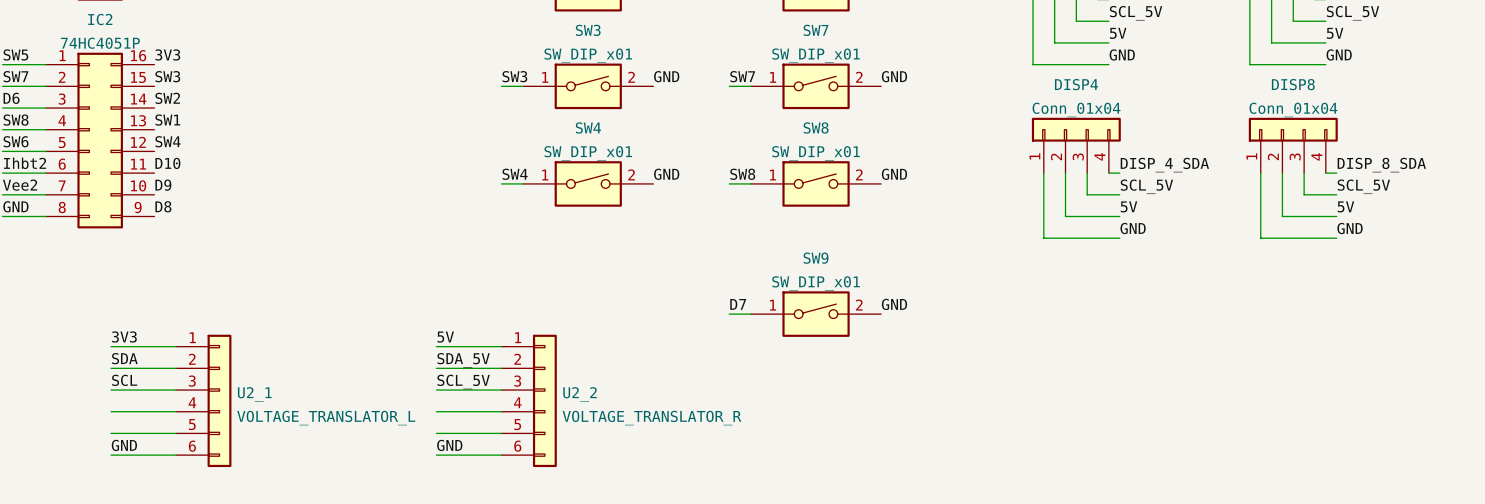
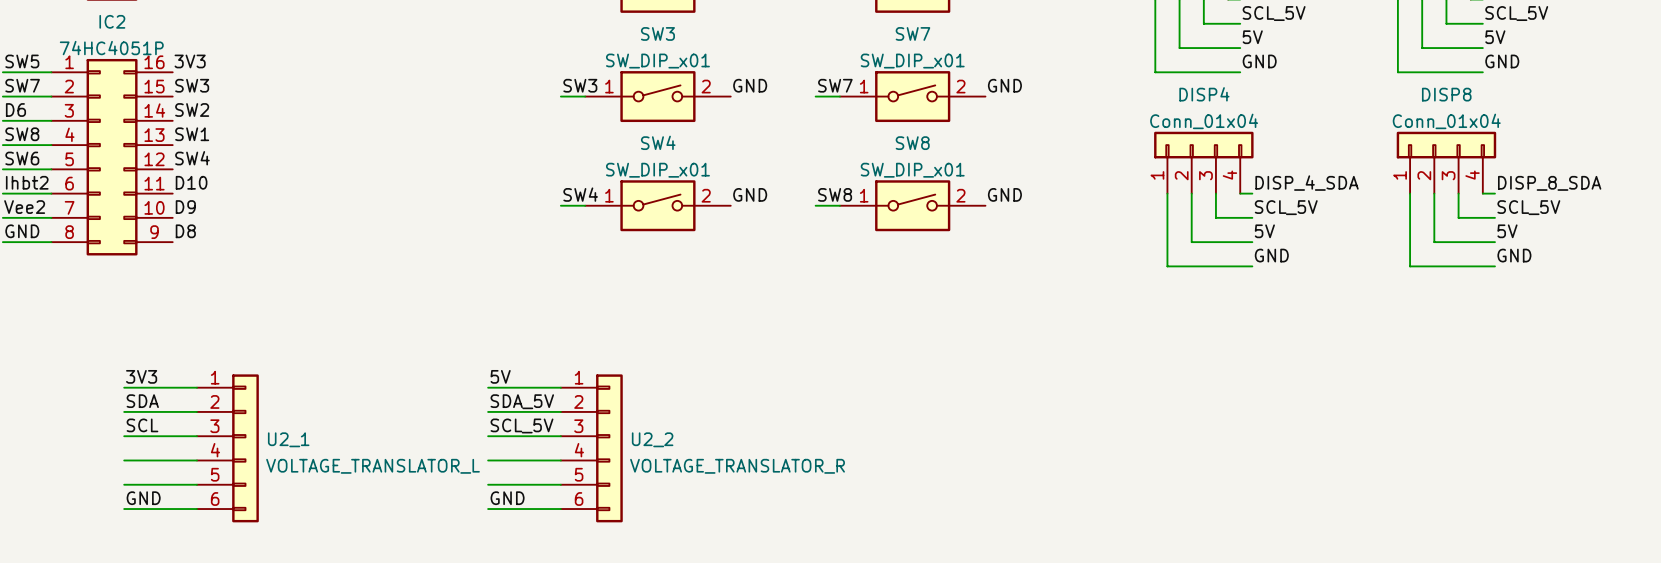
label: D7 (738, 304) -> none
label: GND (894, 304) -> none
wire: (729, 314) (750, 314) -> none
SW9: SW_DIP_x01 (816, 314) -> none

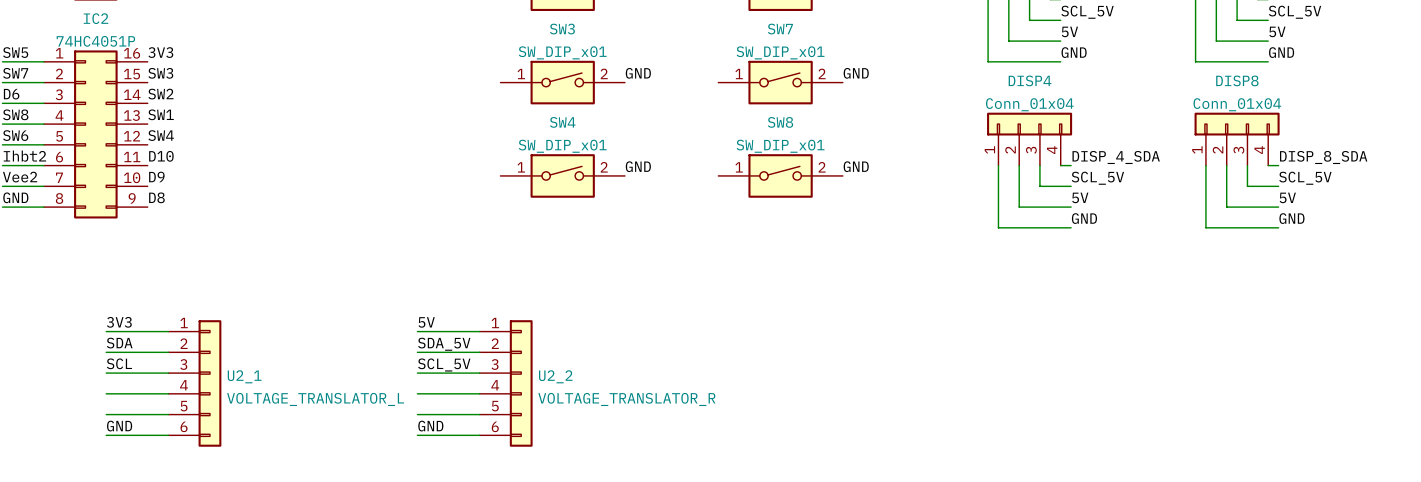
label: SW3 (580, 85) -> none
label: SW7 (835, 85) -> none
wire: (560, 96) (585, 96) -> none
wire: (815, 96) (839, 96) -> none
label: SW4 (580, 194) -> none
label: SW8 (835, 194) -> none
wire: (560, 205) (585, 205) -> none
wire: (815, 205) (839, 205) -> none

